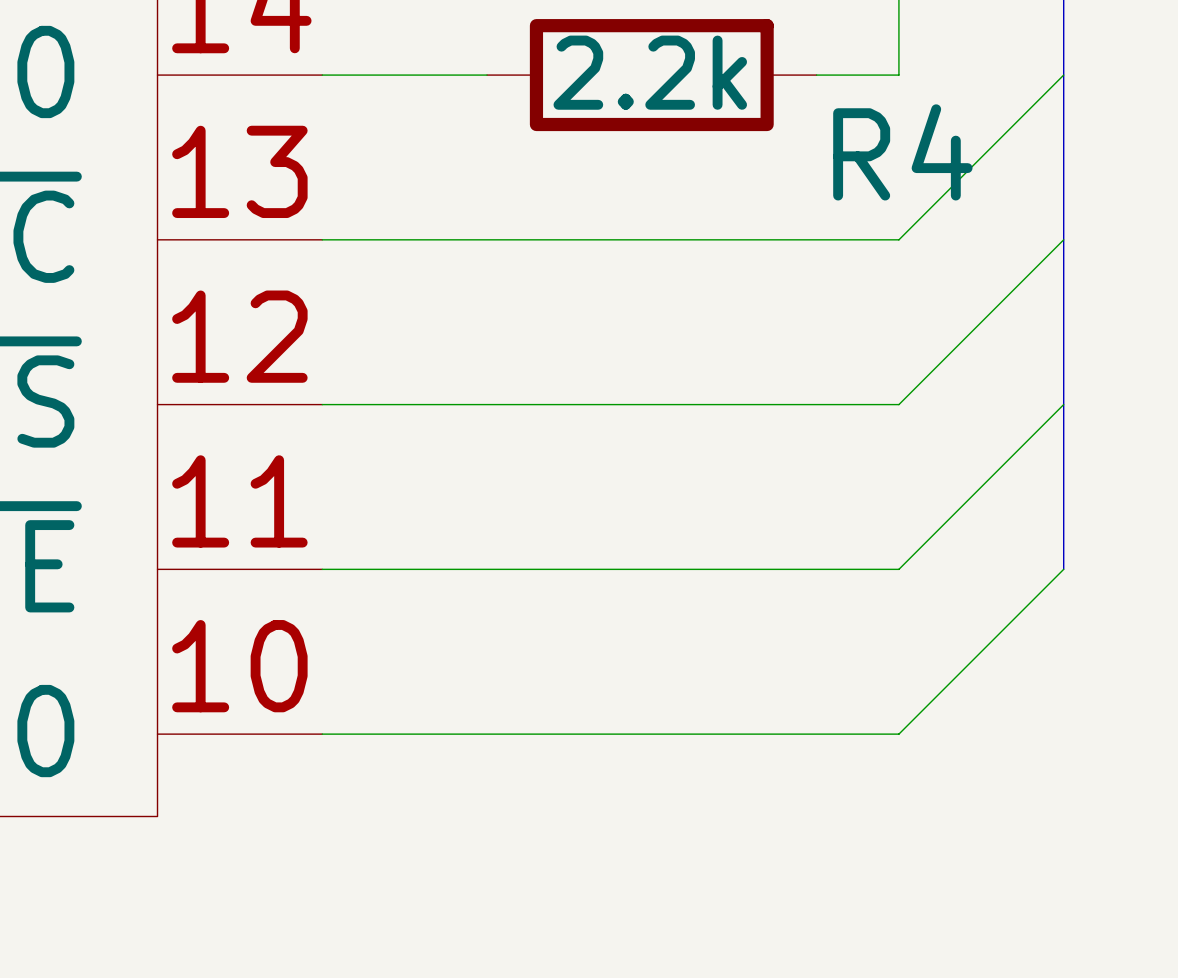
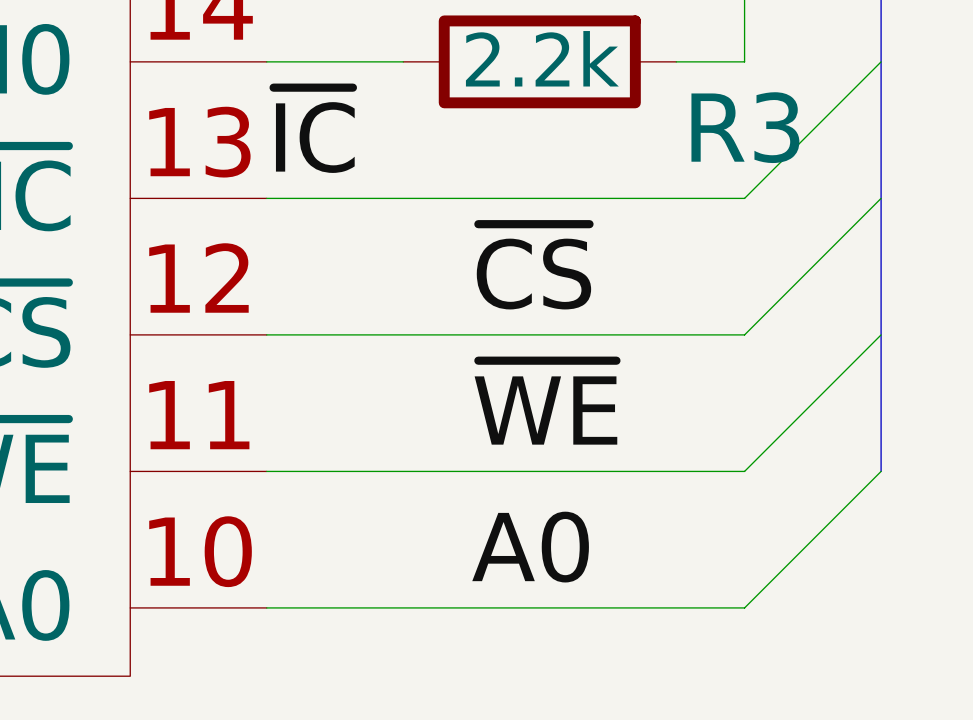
R4 name: R4 (902, 152) -> R3 (745, 127)
label: none -> ~{IC} (314, 130)
label: none -> ~{CS} (533, 266)
label: none -> ~{WE} (545, 402)
label: none -> A0 (530, 547)

